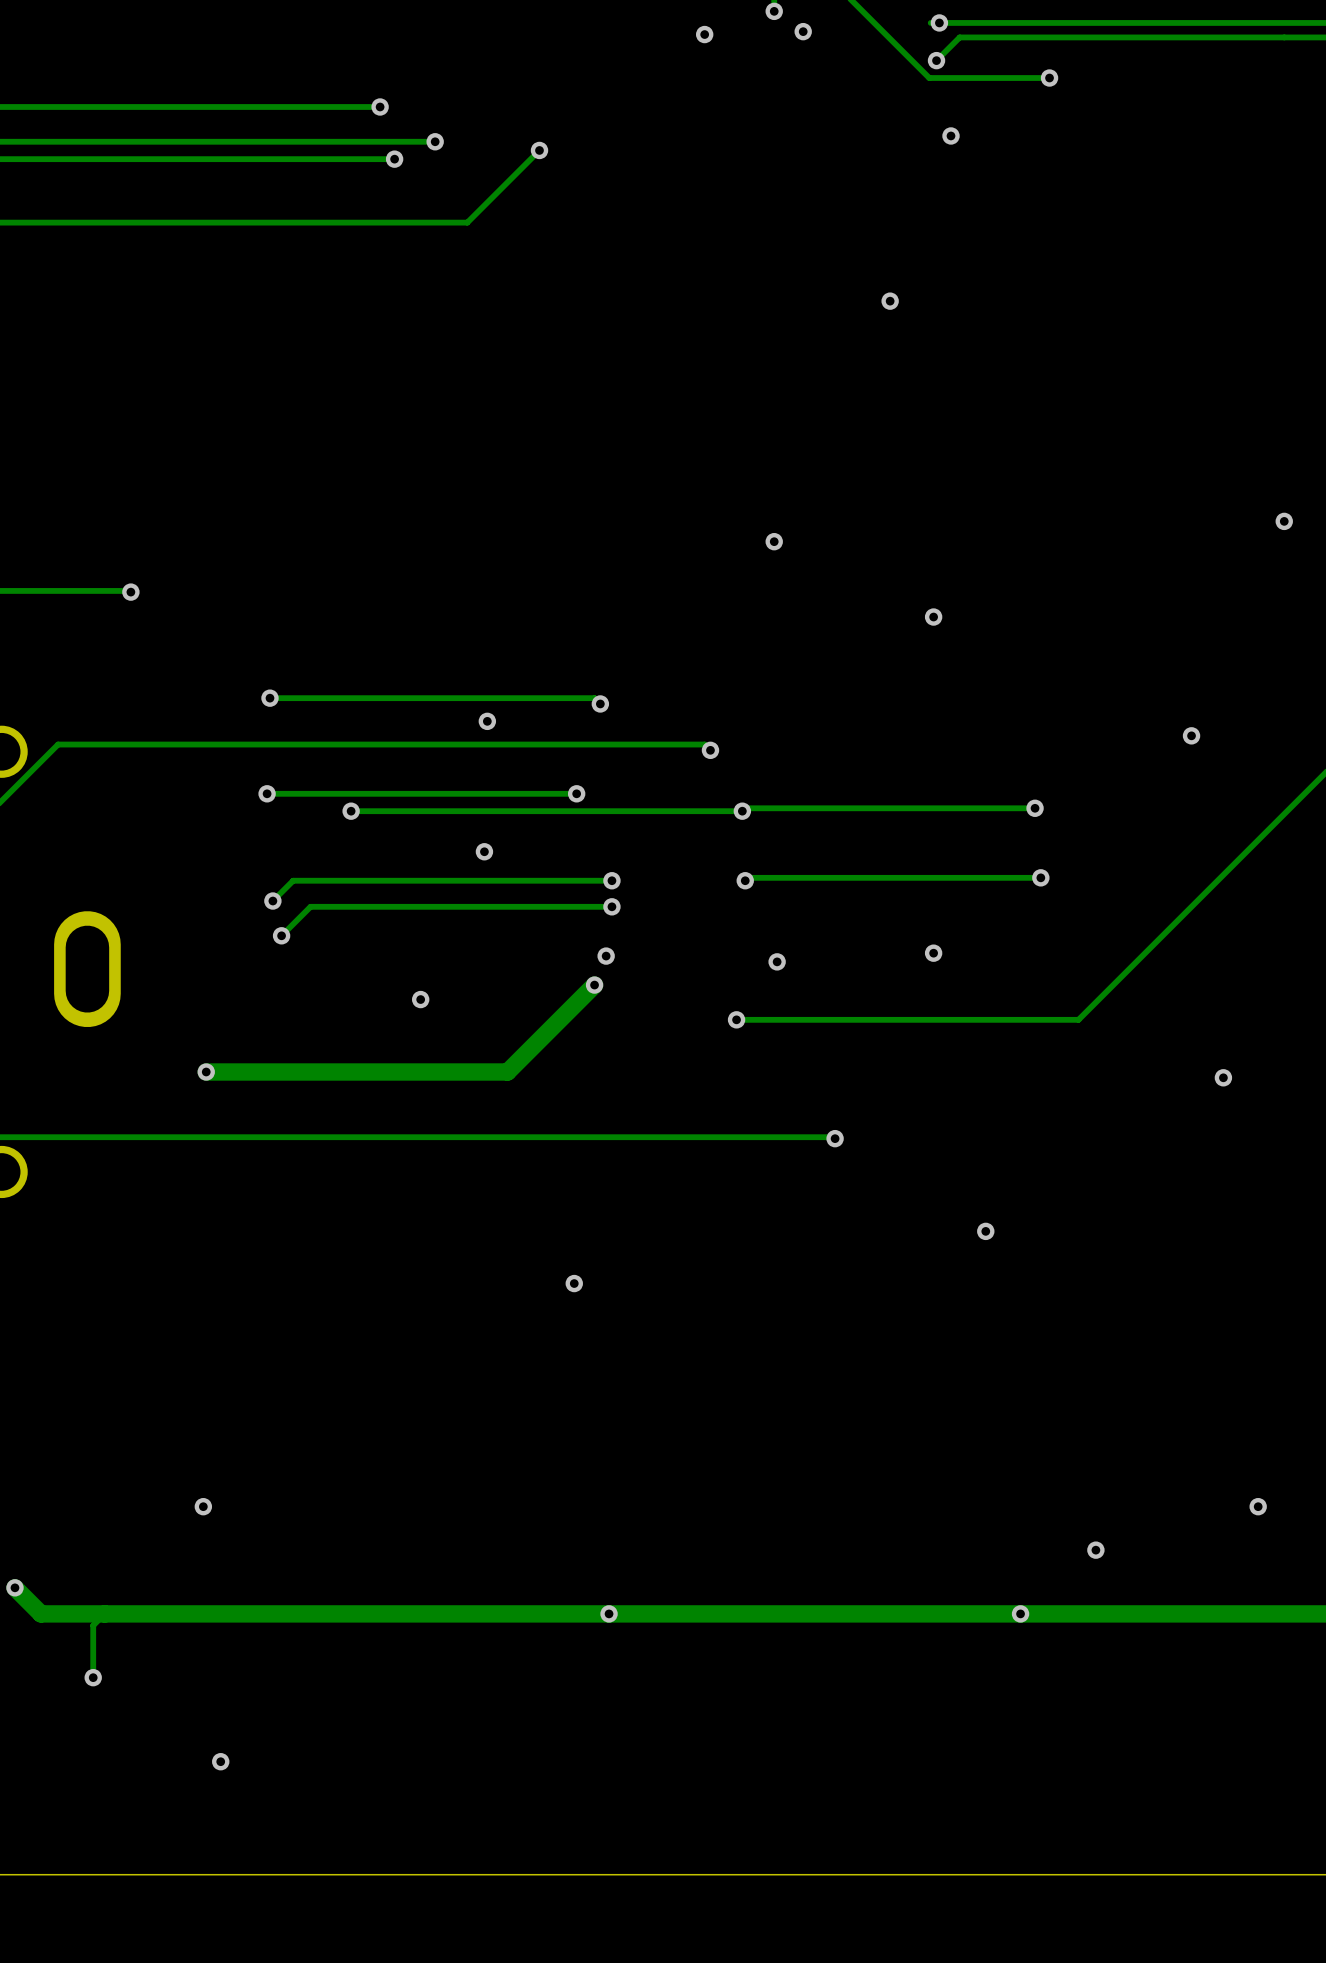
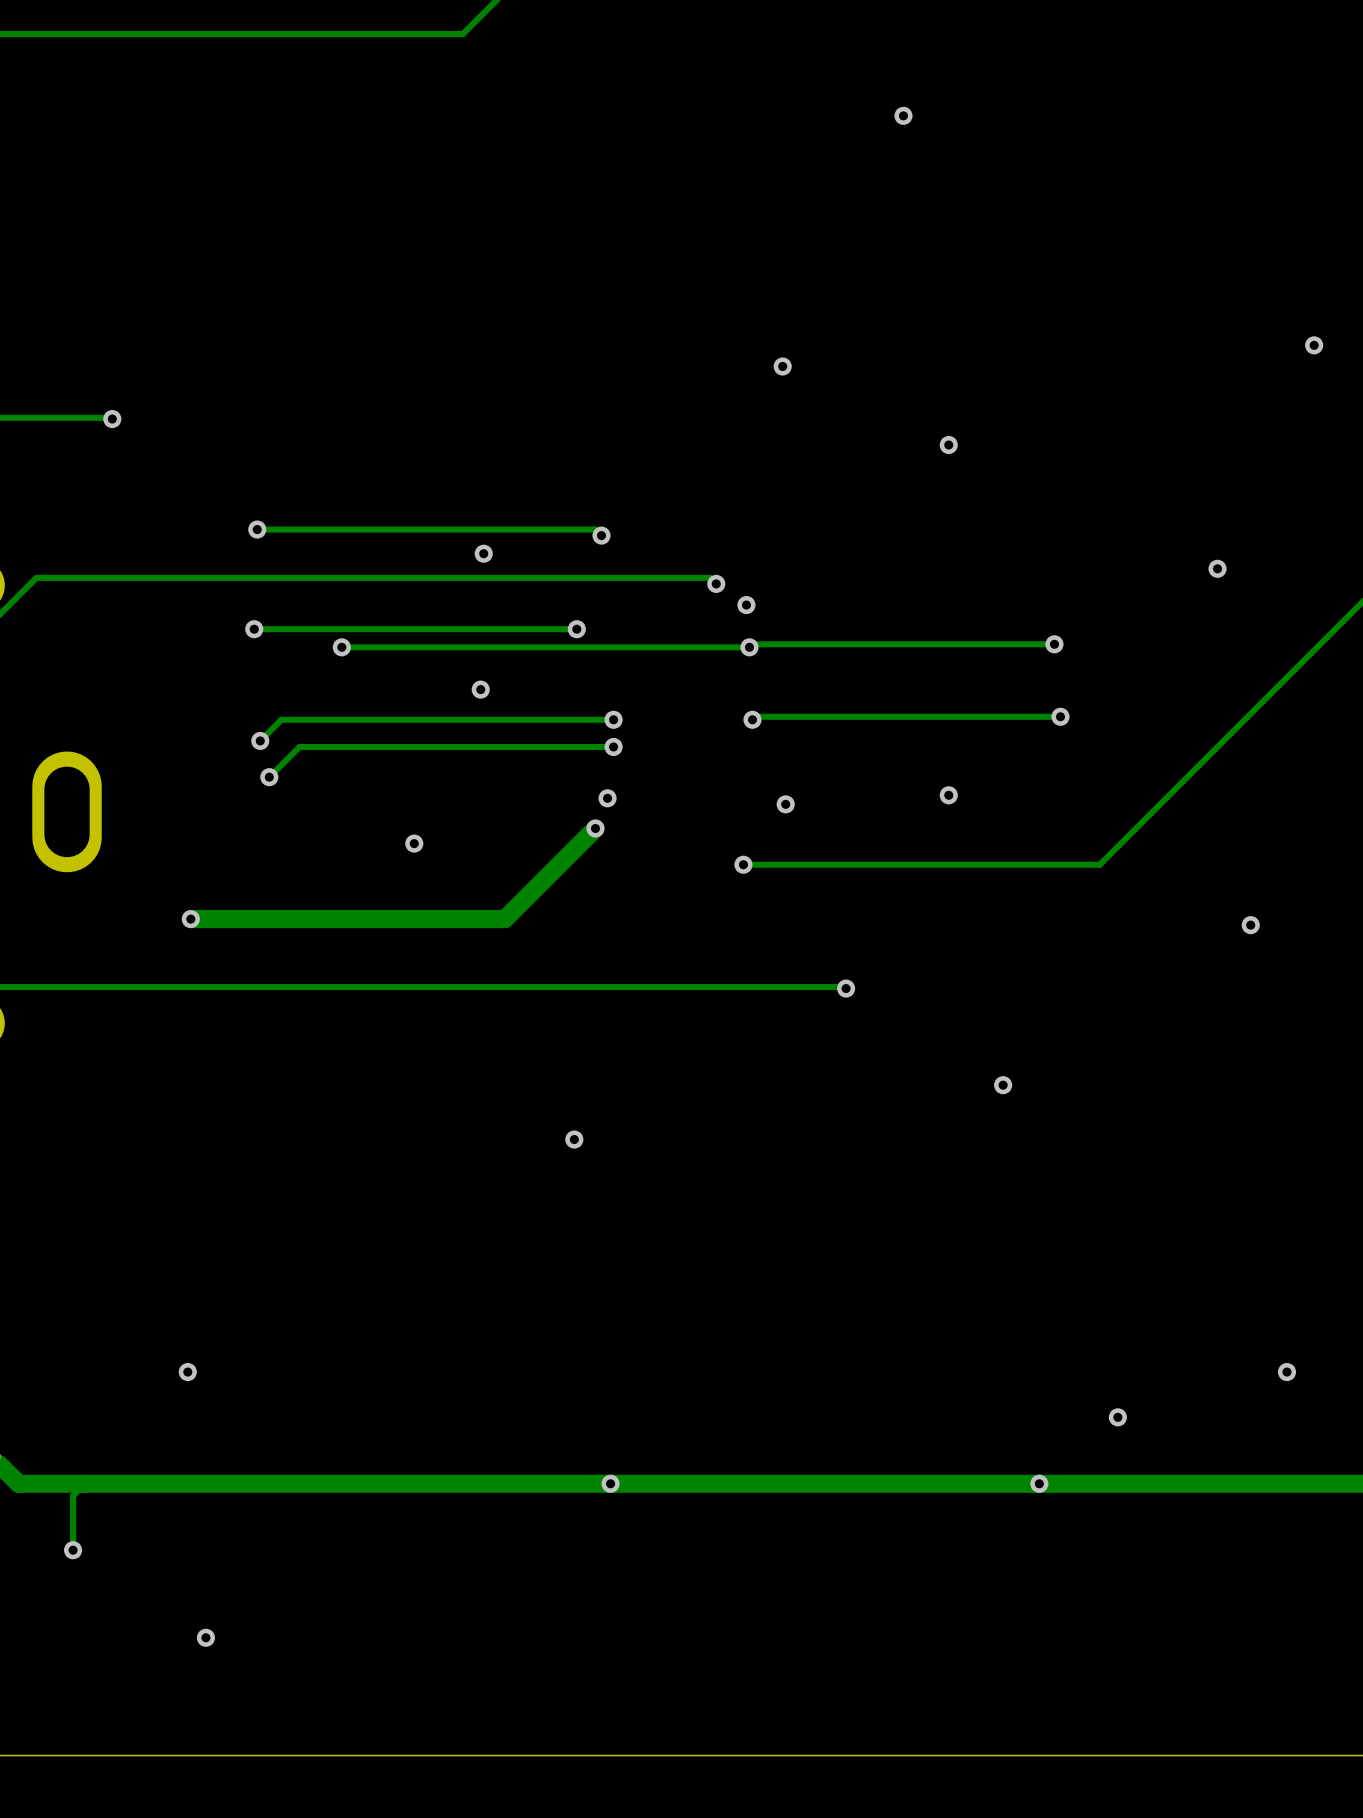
via: none -> (746, 605)

